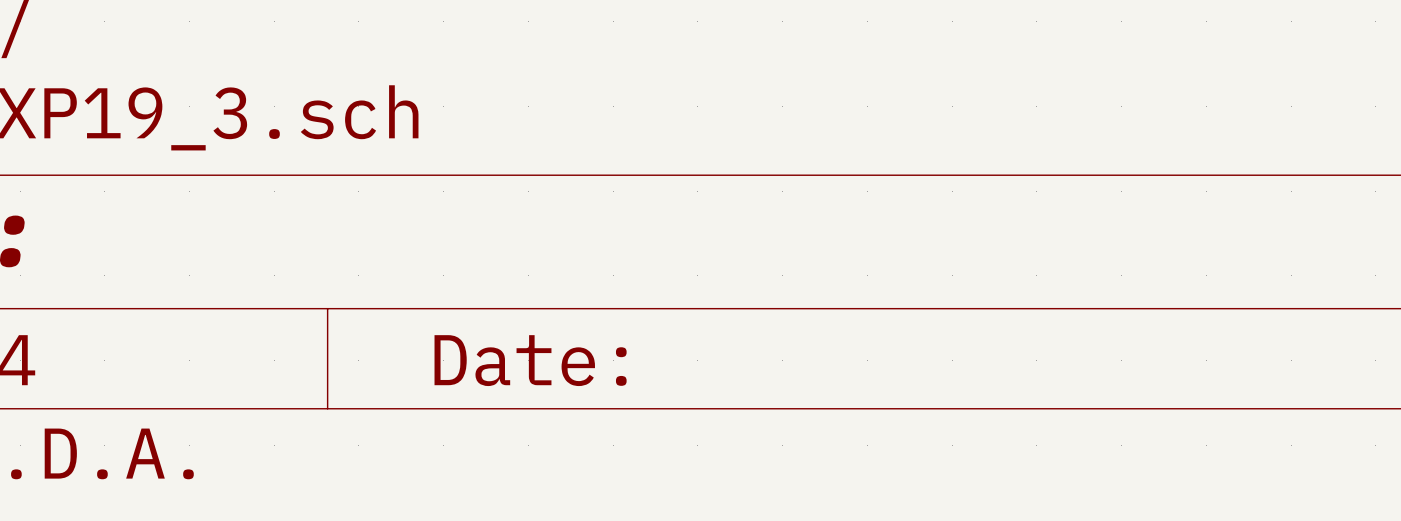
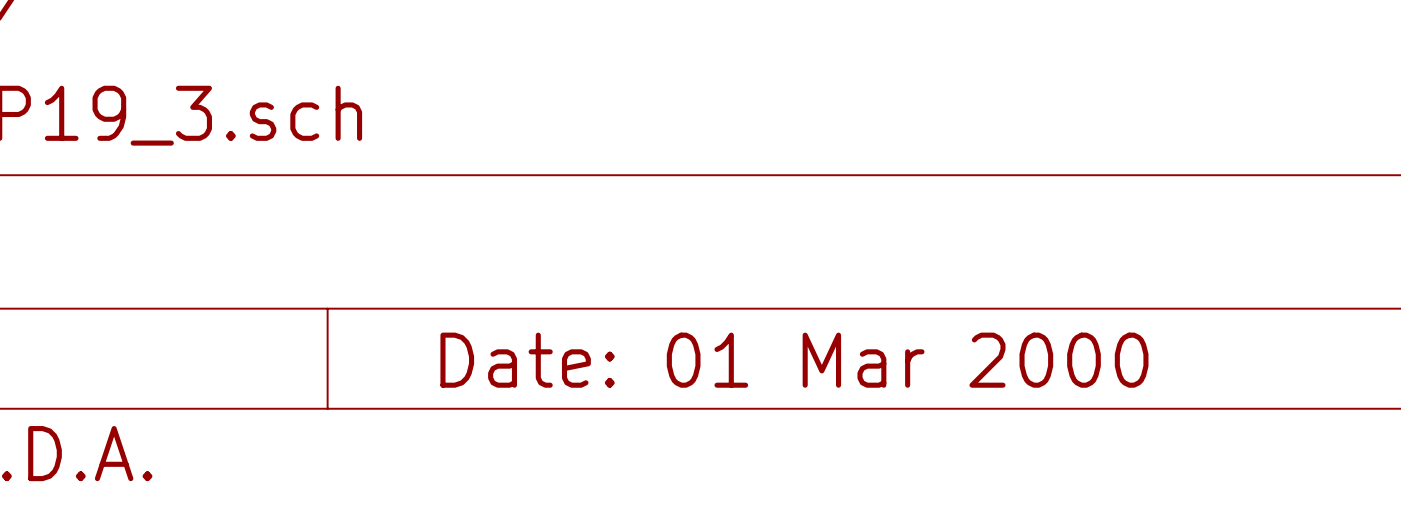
title block: Date: (530, 360) -> Date: 01 Mar 2000 (794, 360)

